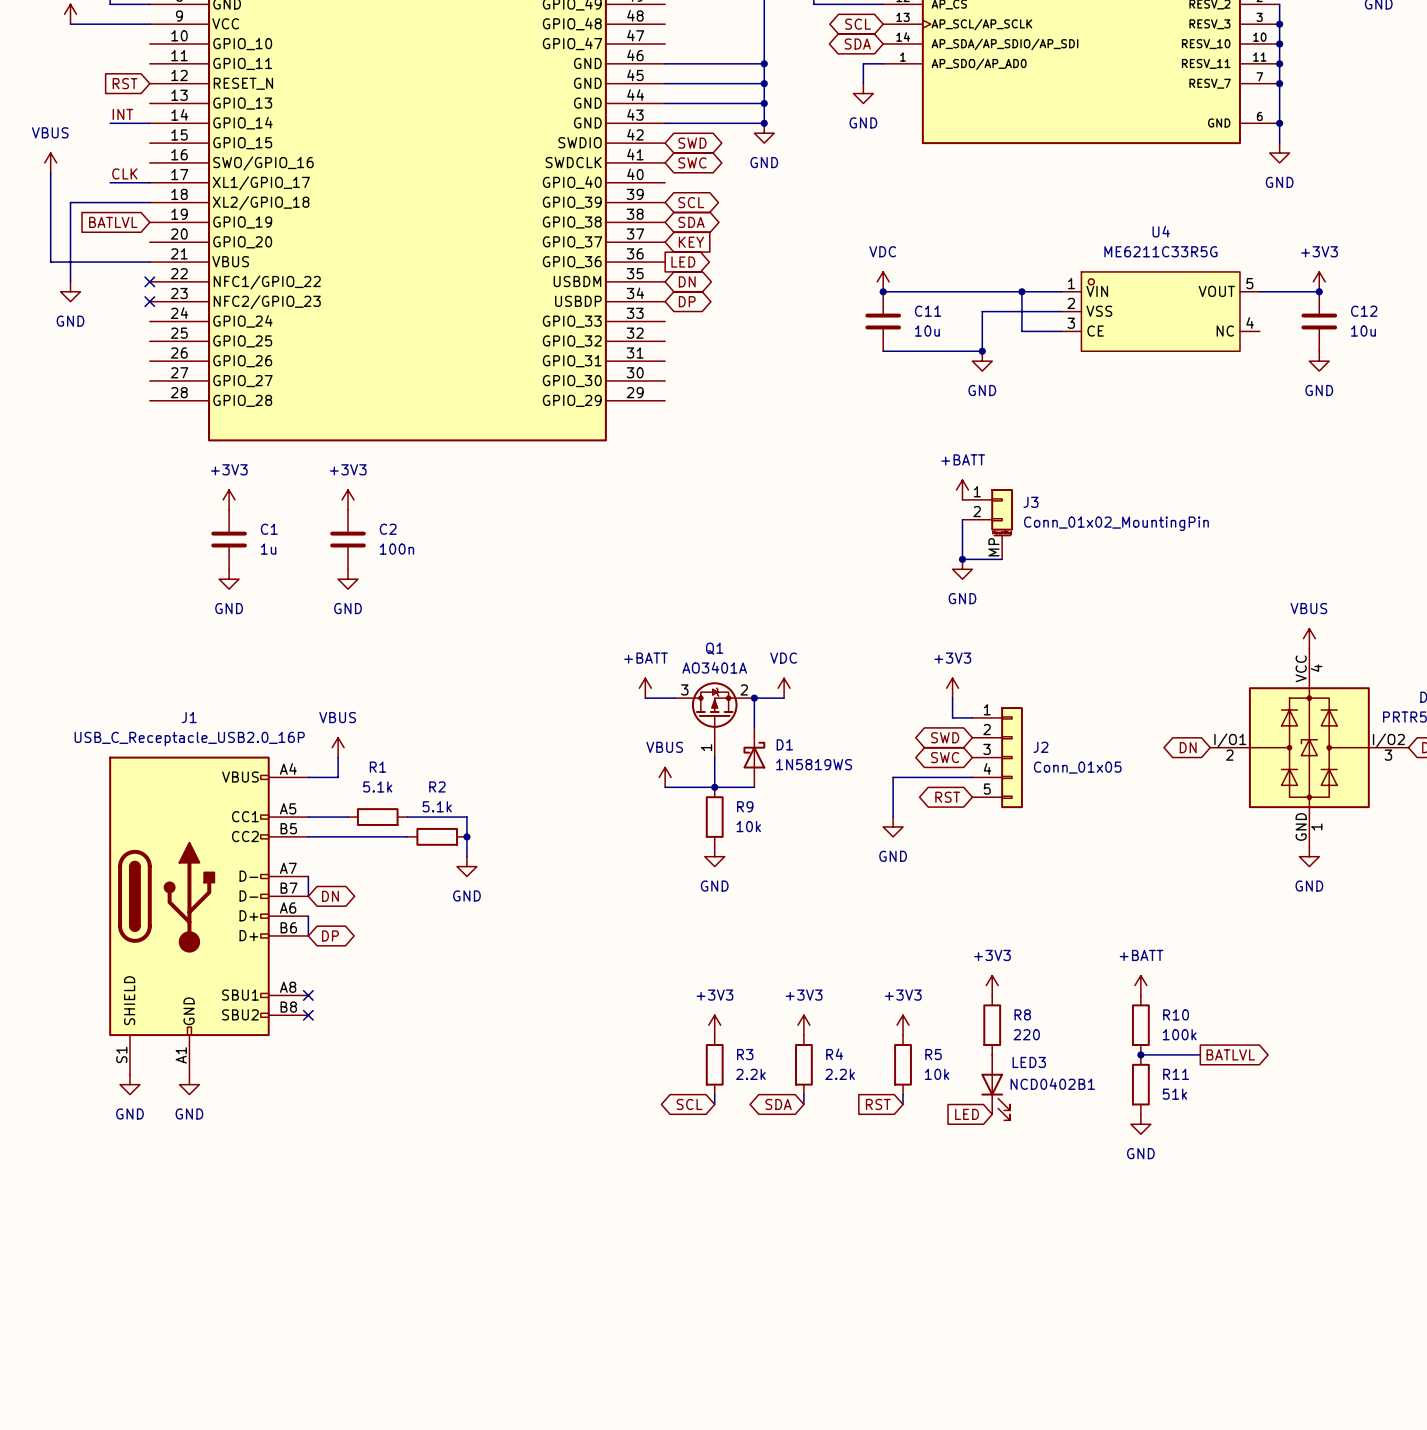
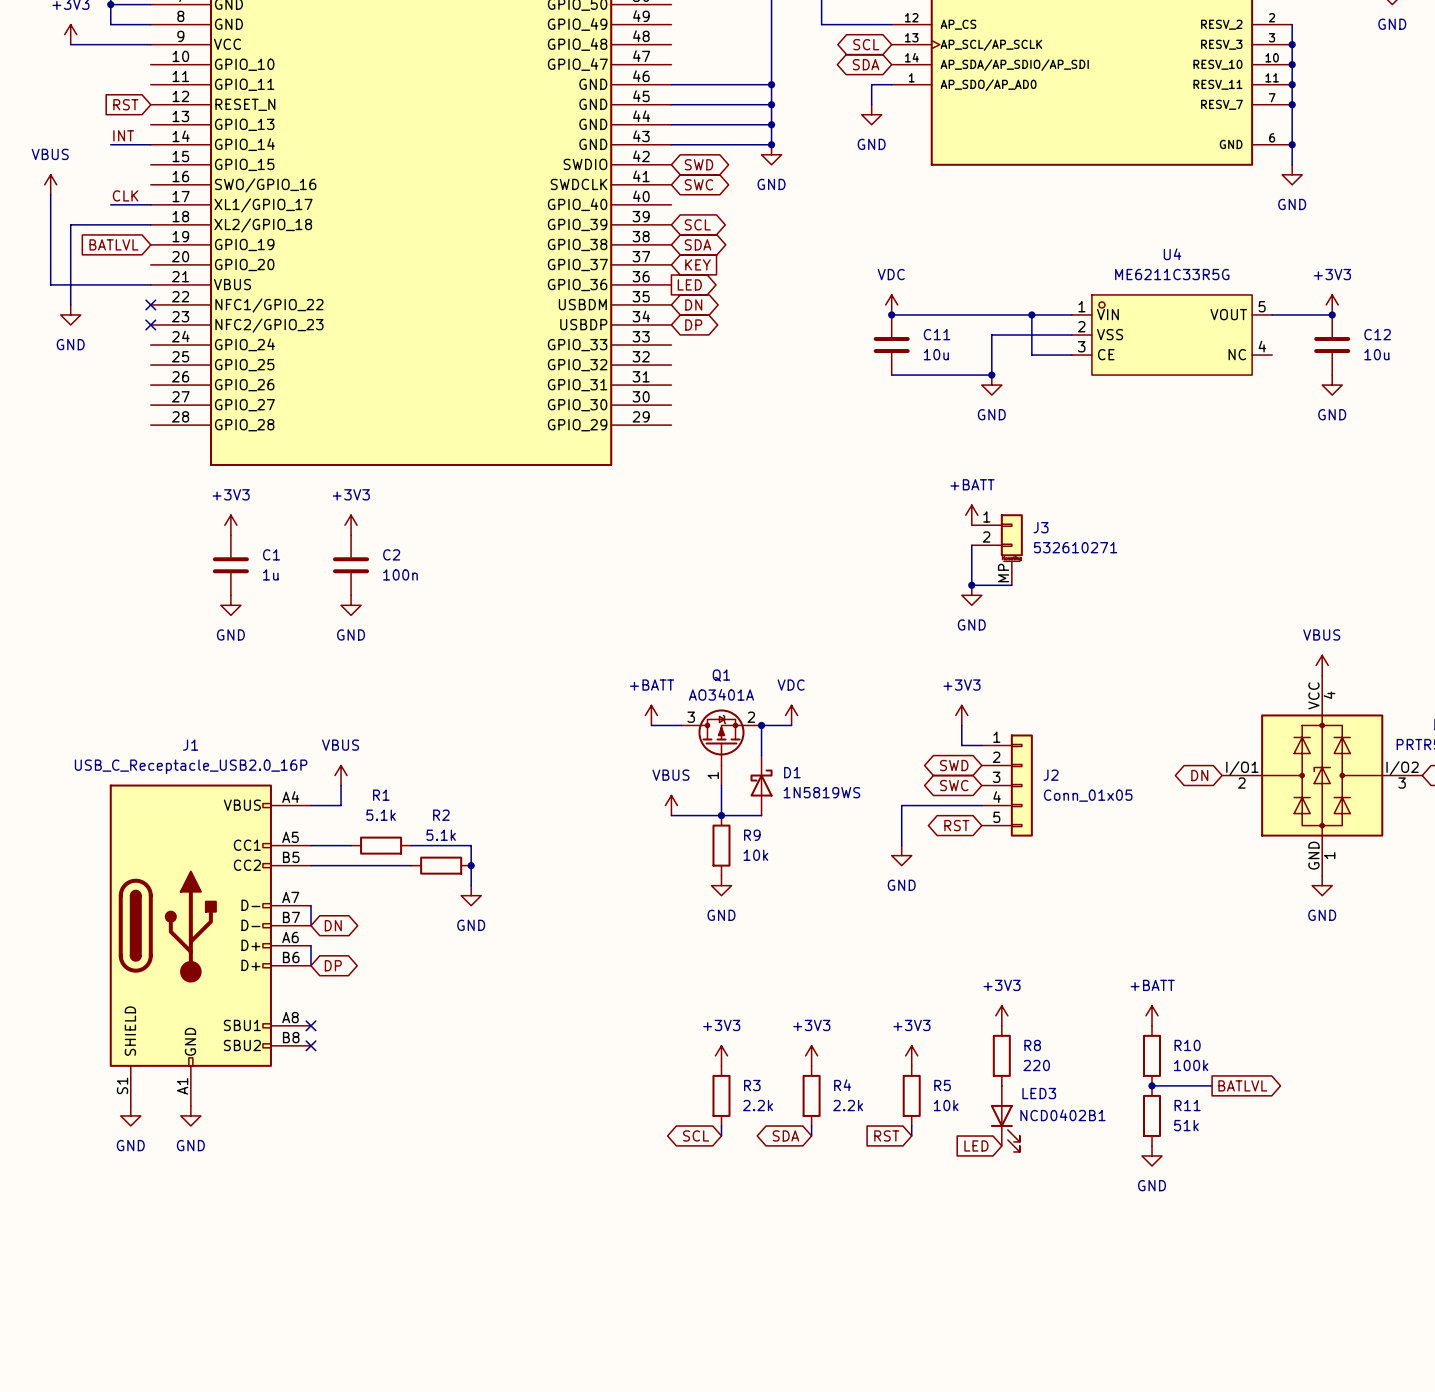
J3 value: Conn_01x02_MountingPin (1116, 523) -> 532610271 (1075, 547)

